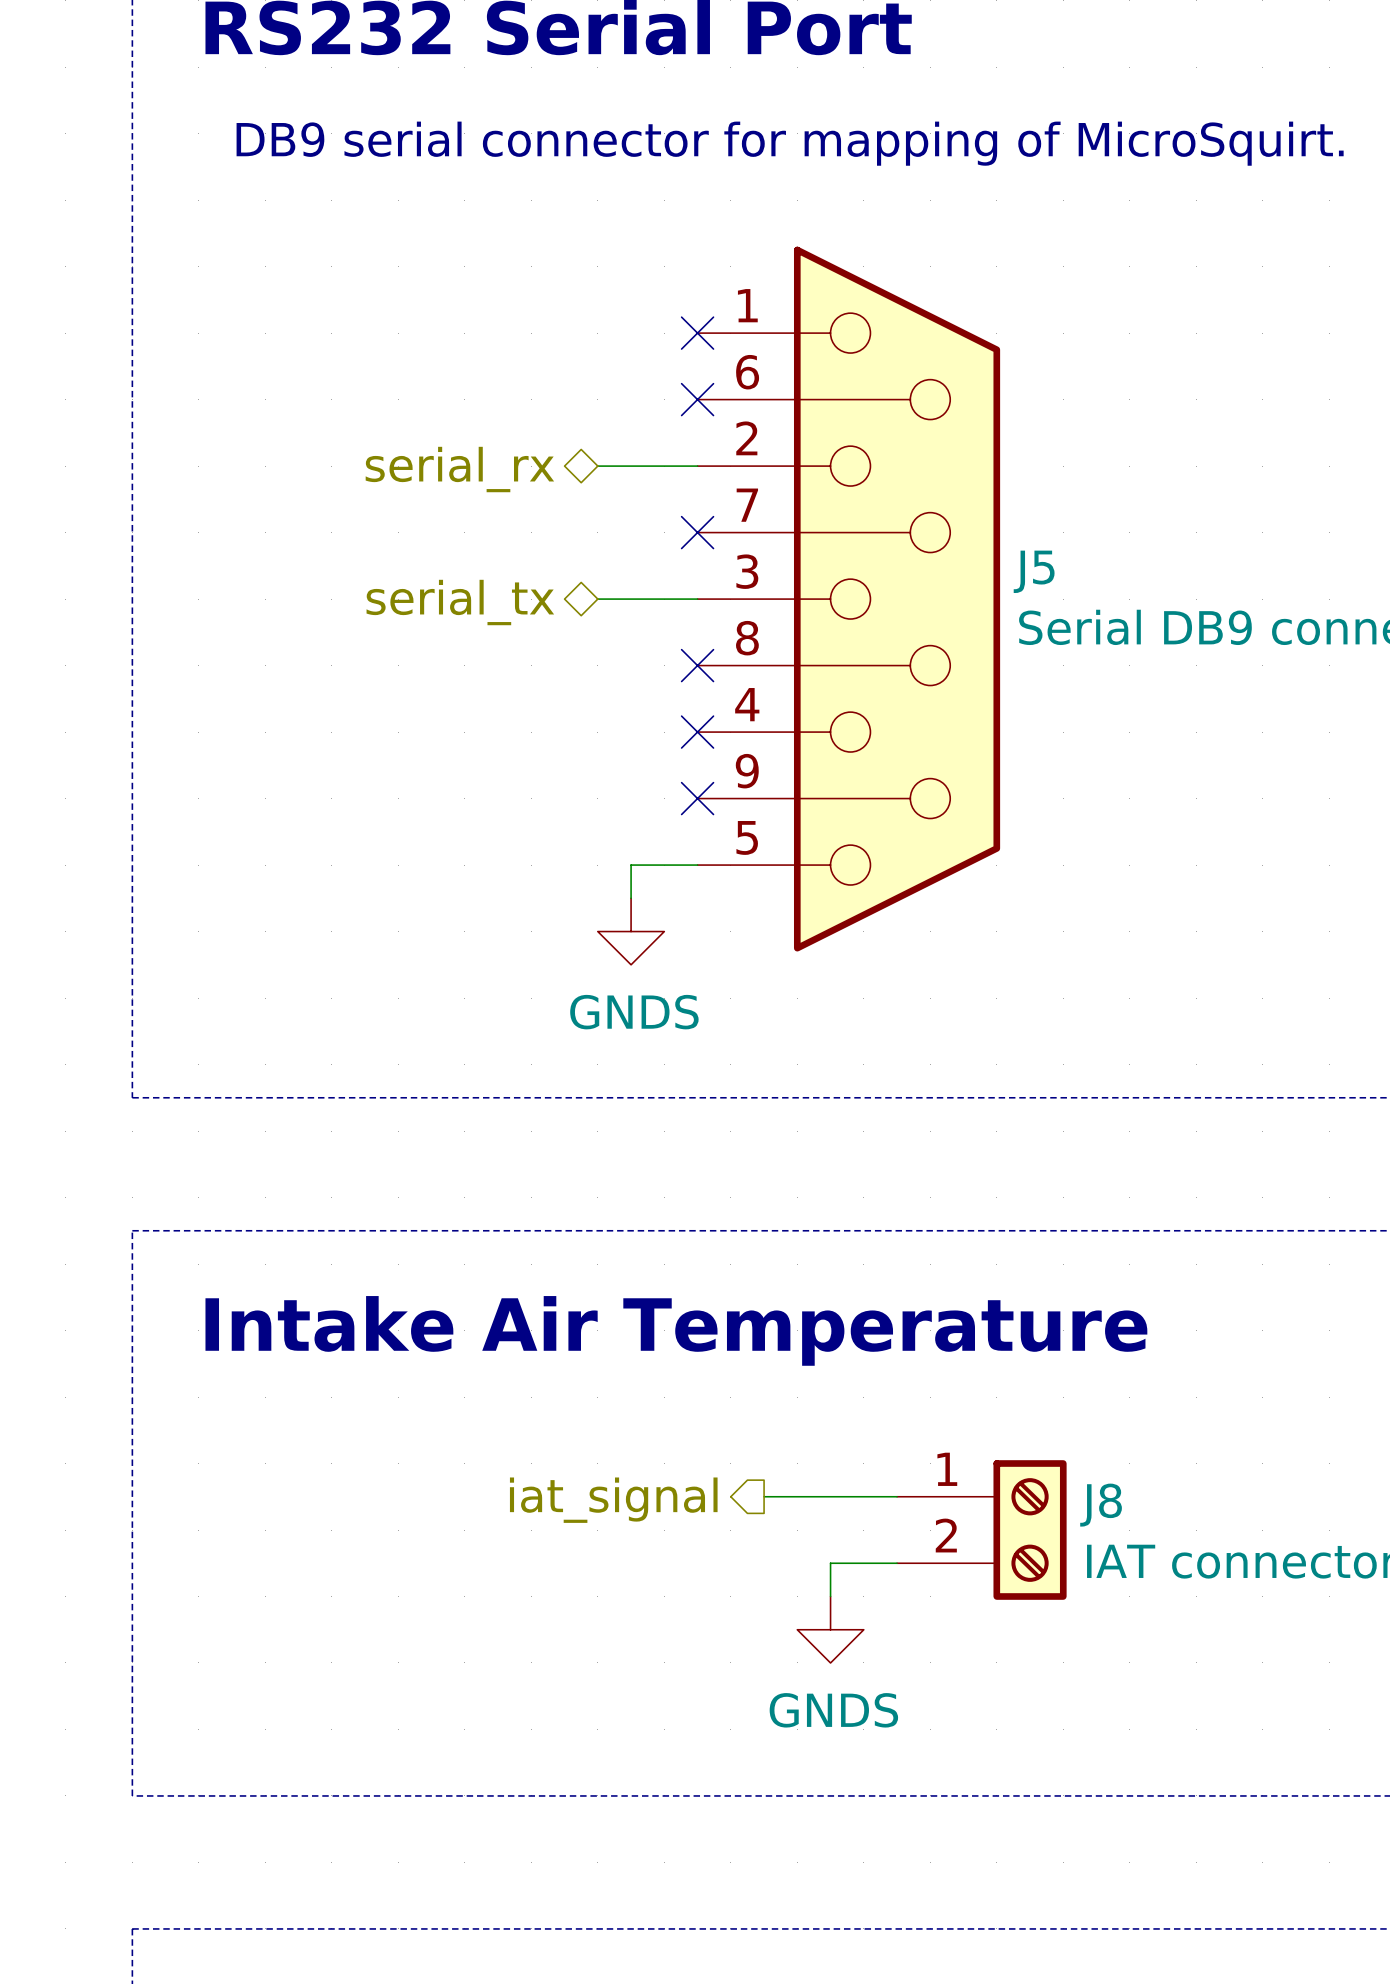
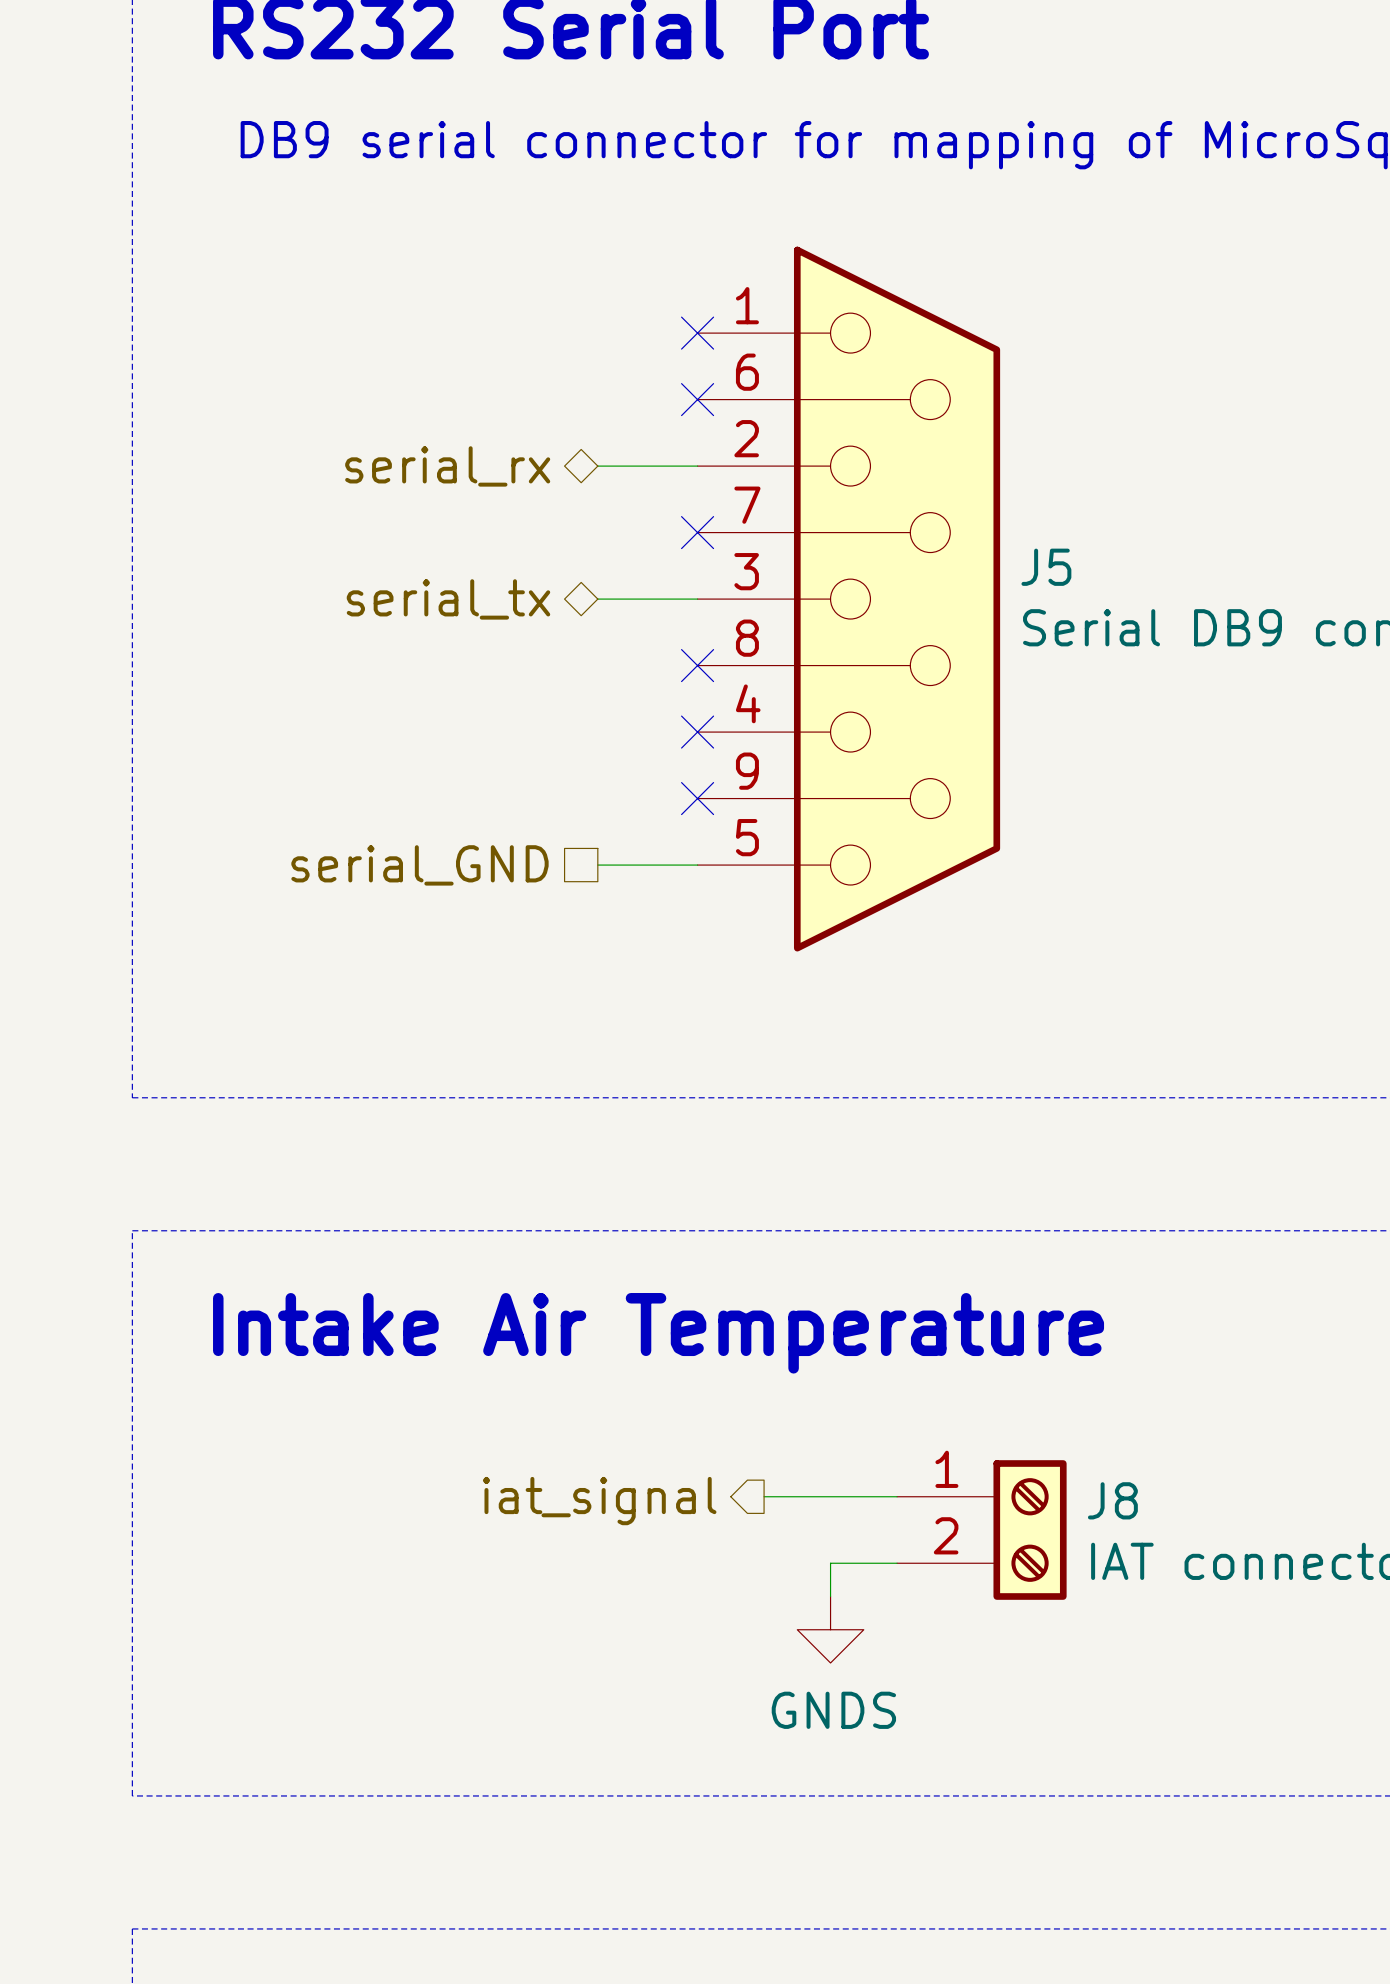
wire: (631, 865) (631, 898) -> (631, 865) (597, 865)
hierarchical label: none -> serial_GND (419, 865)
power symbol: GNDS (631, 931) -> none

